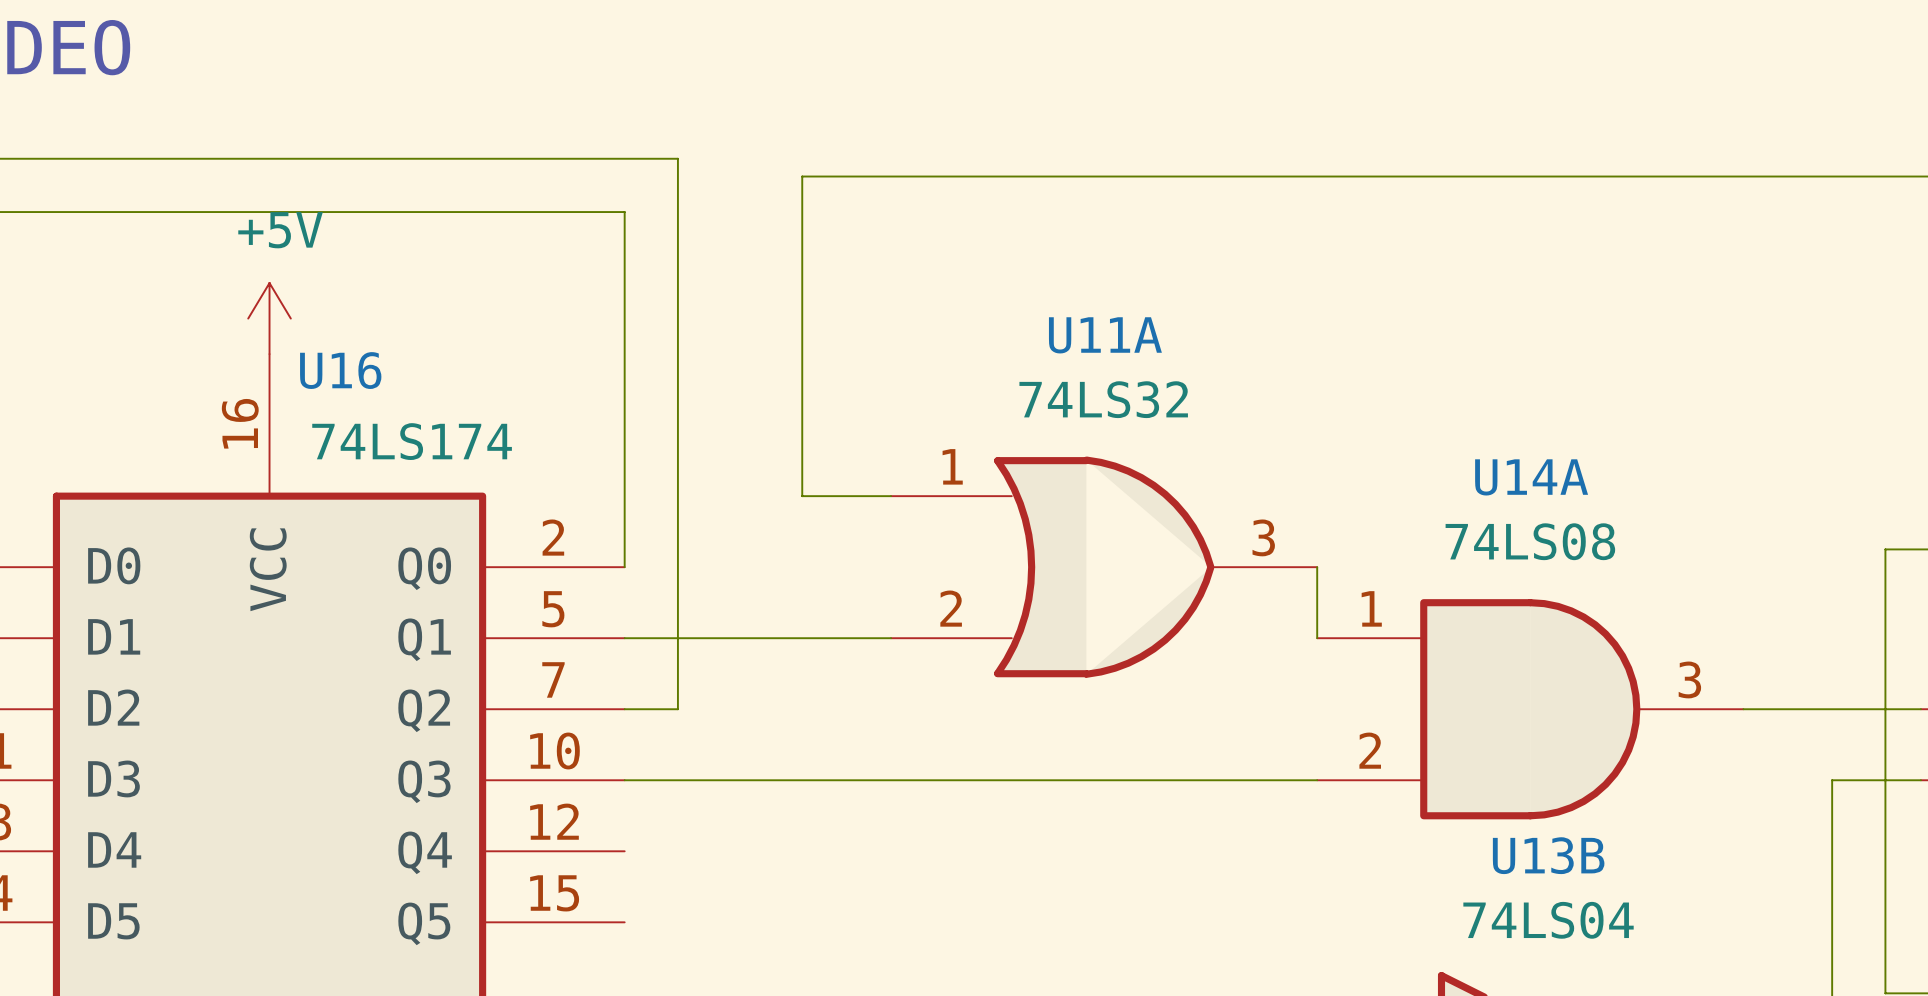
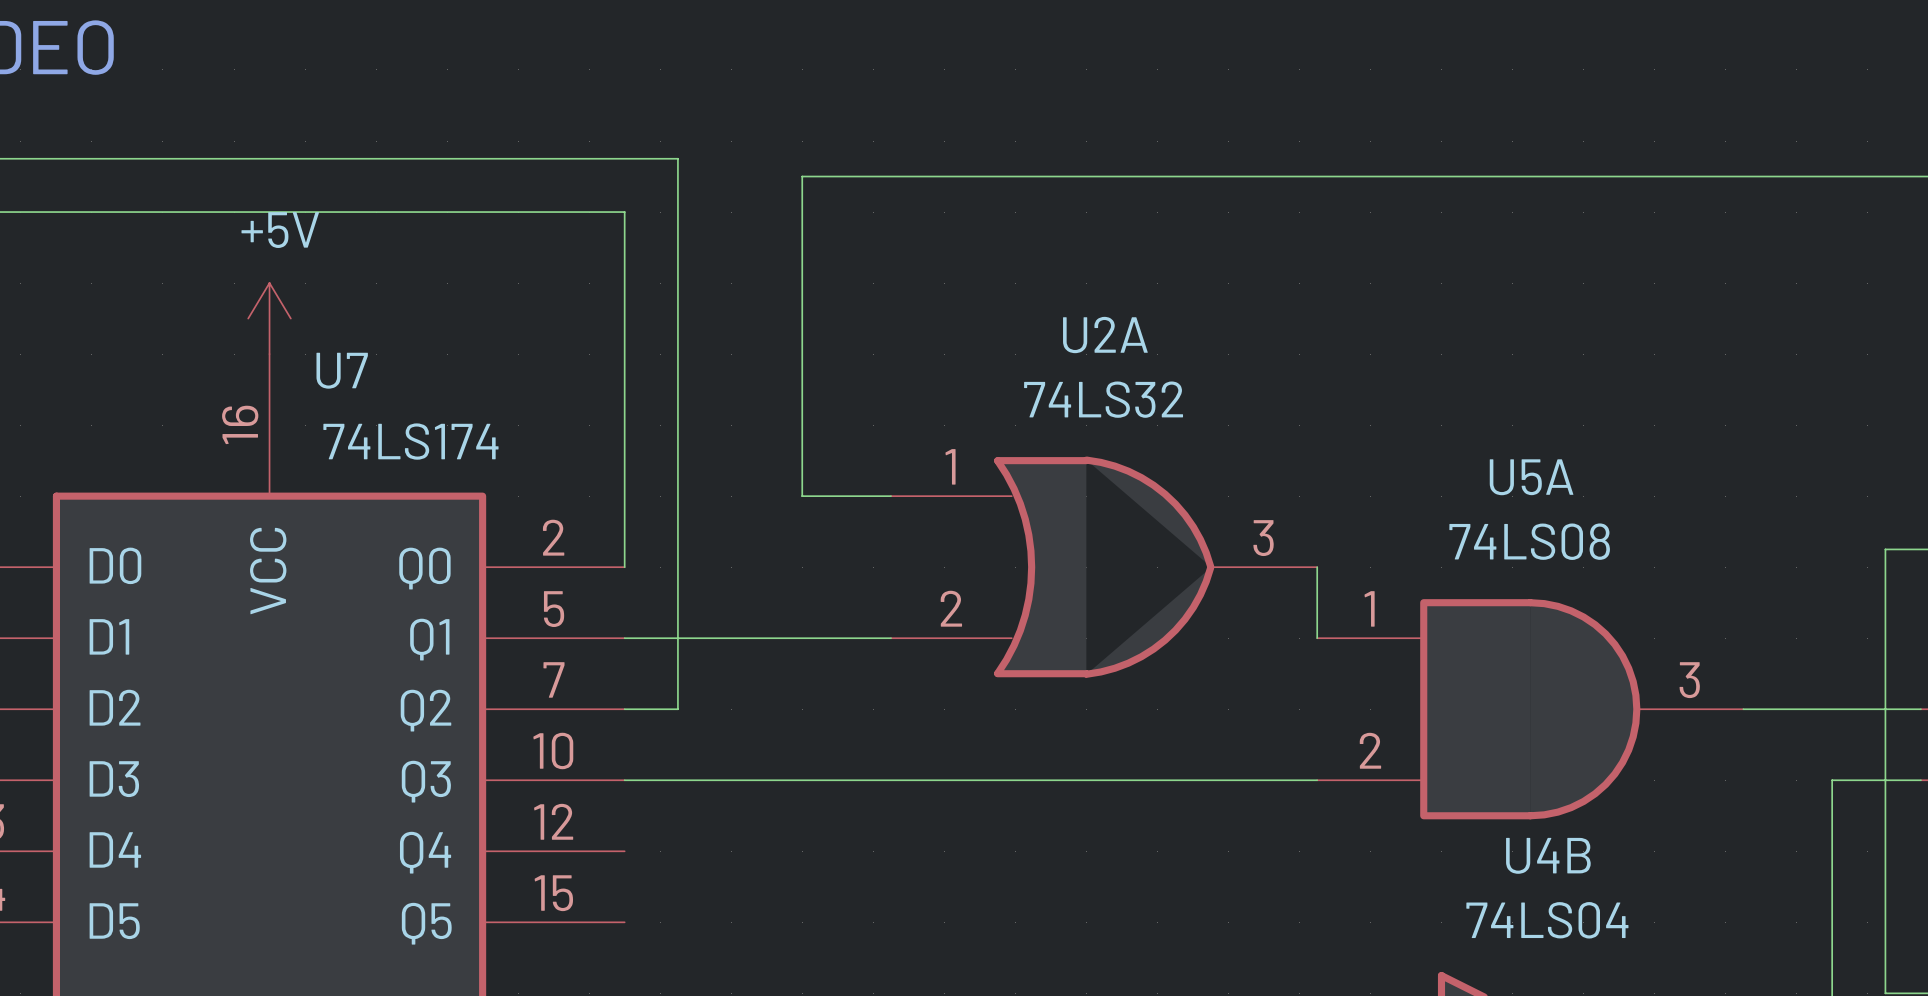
U11A name: U11A (1105, 335) -> U2A (1105, 335)
U16 name: U16 (340, 370) -> U7 (342, 370)
U14A name: U14A (1531, 477) -> U5A (1531, 477)
U13B name: U13B (1548, 855) -> U4B (1548, 855)

